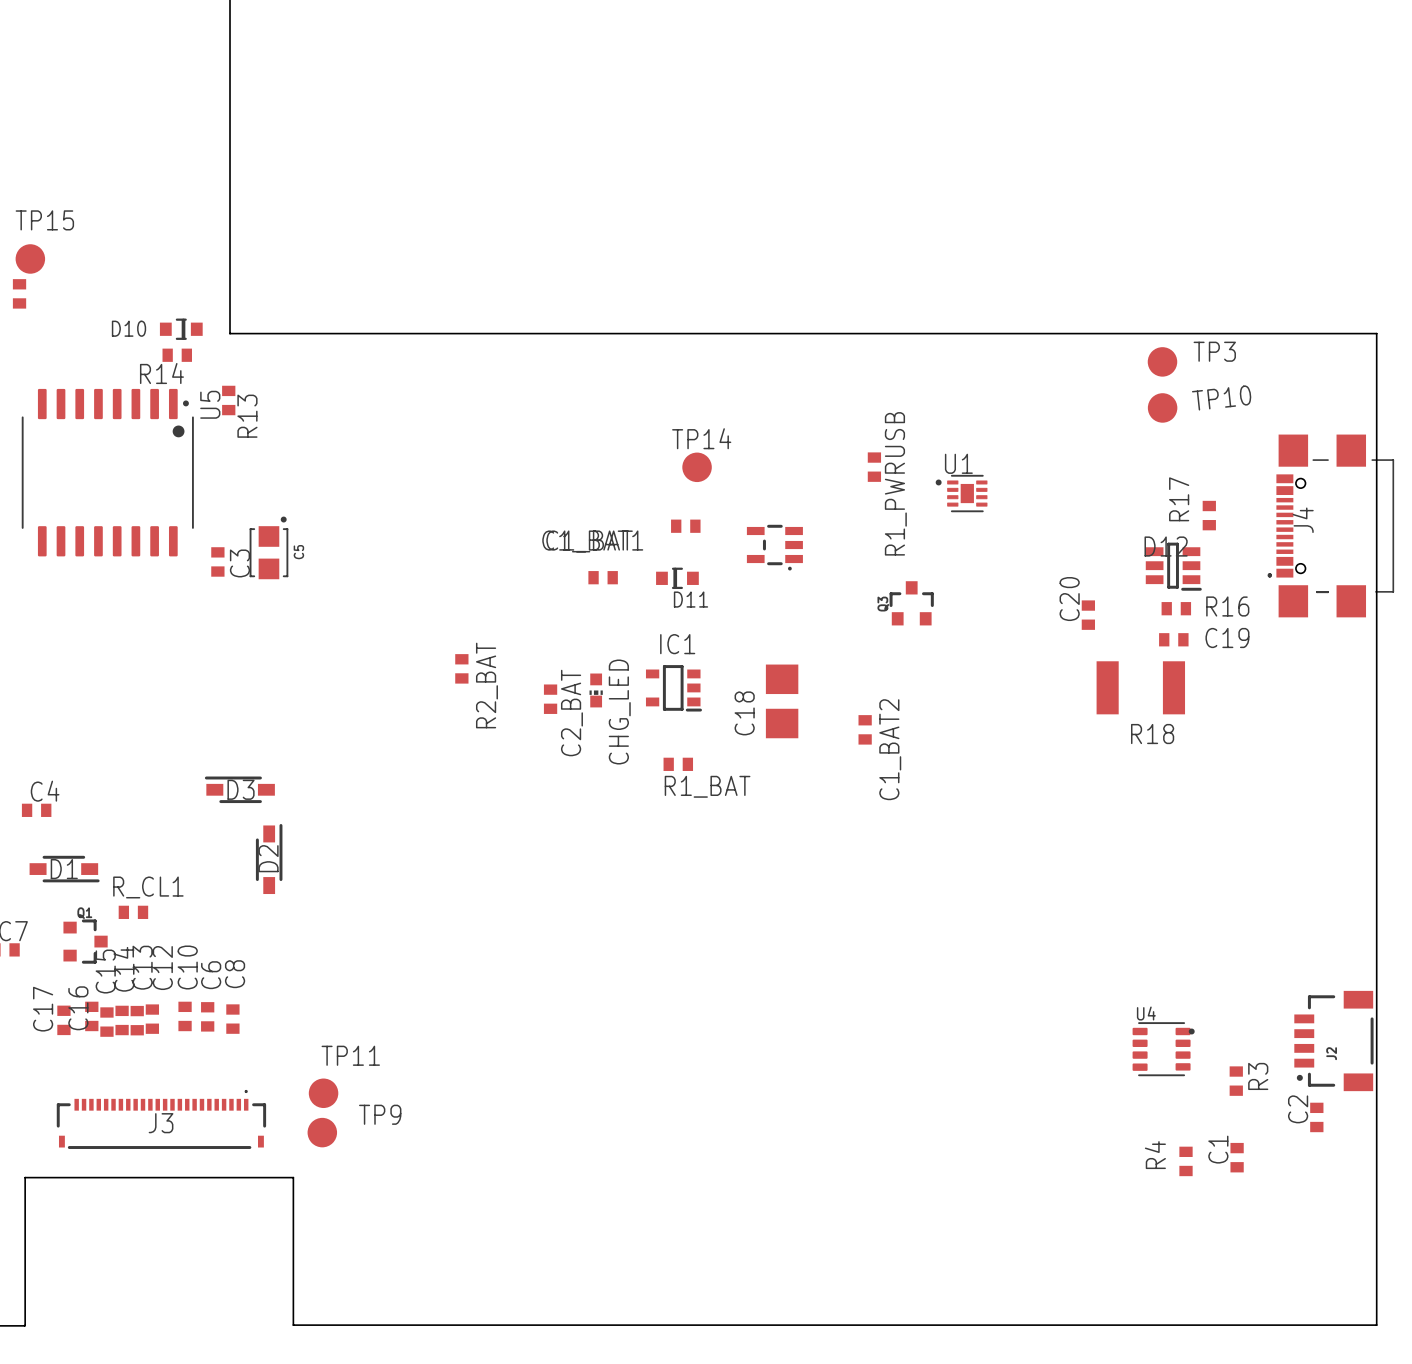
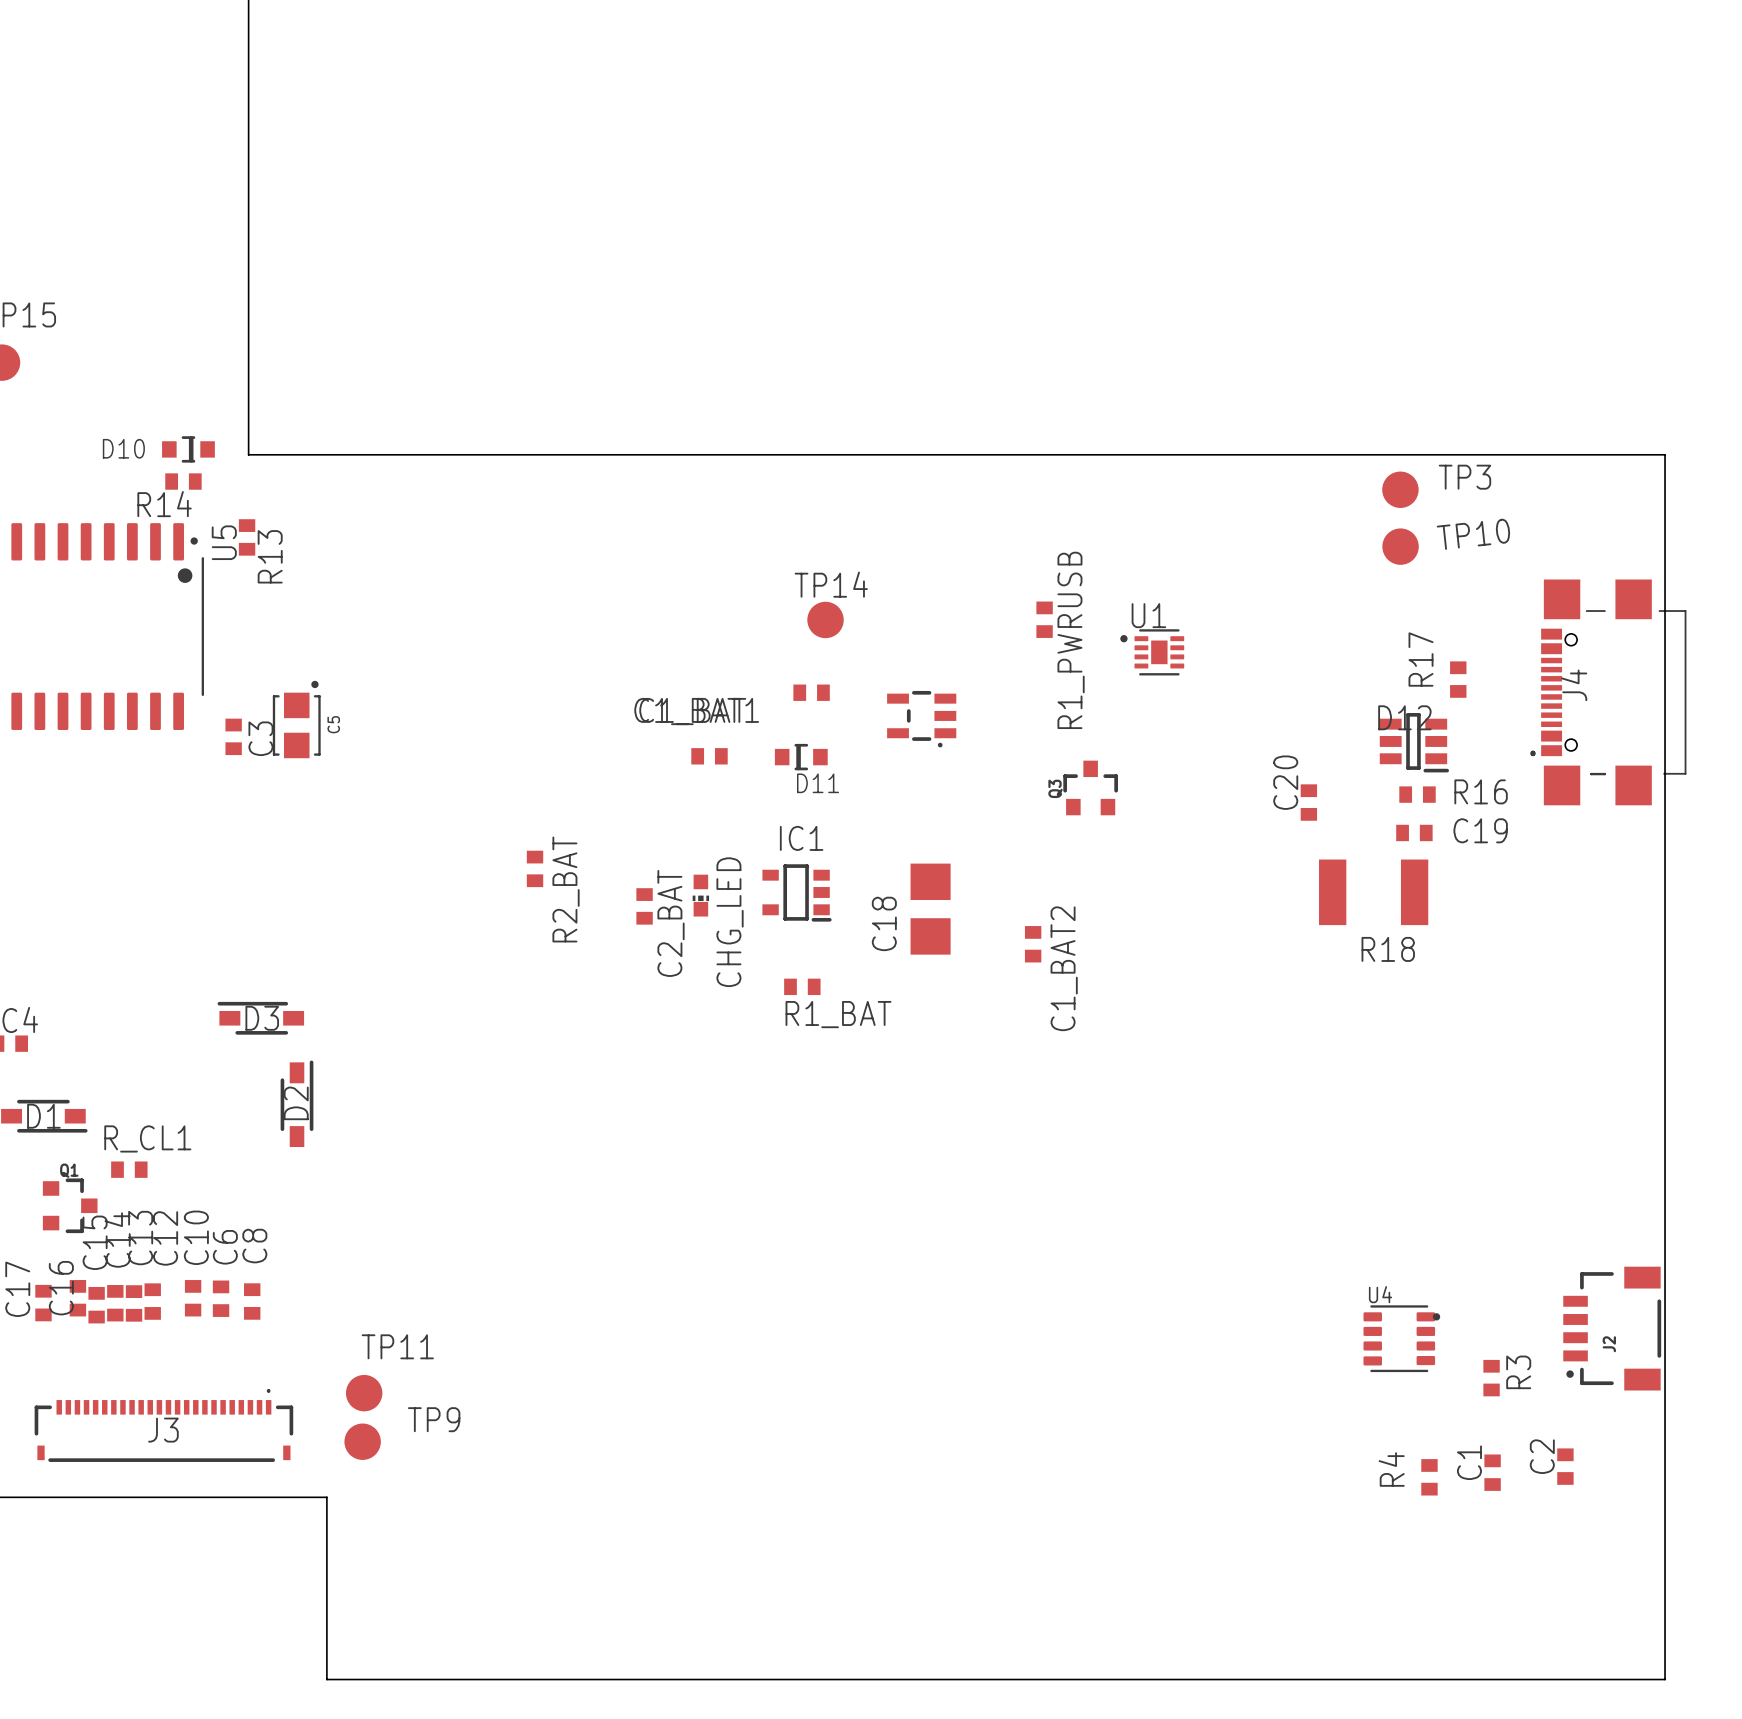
C2 position: (1316, 1117) -> (1565, 1466)

